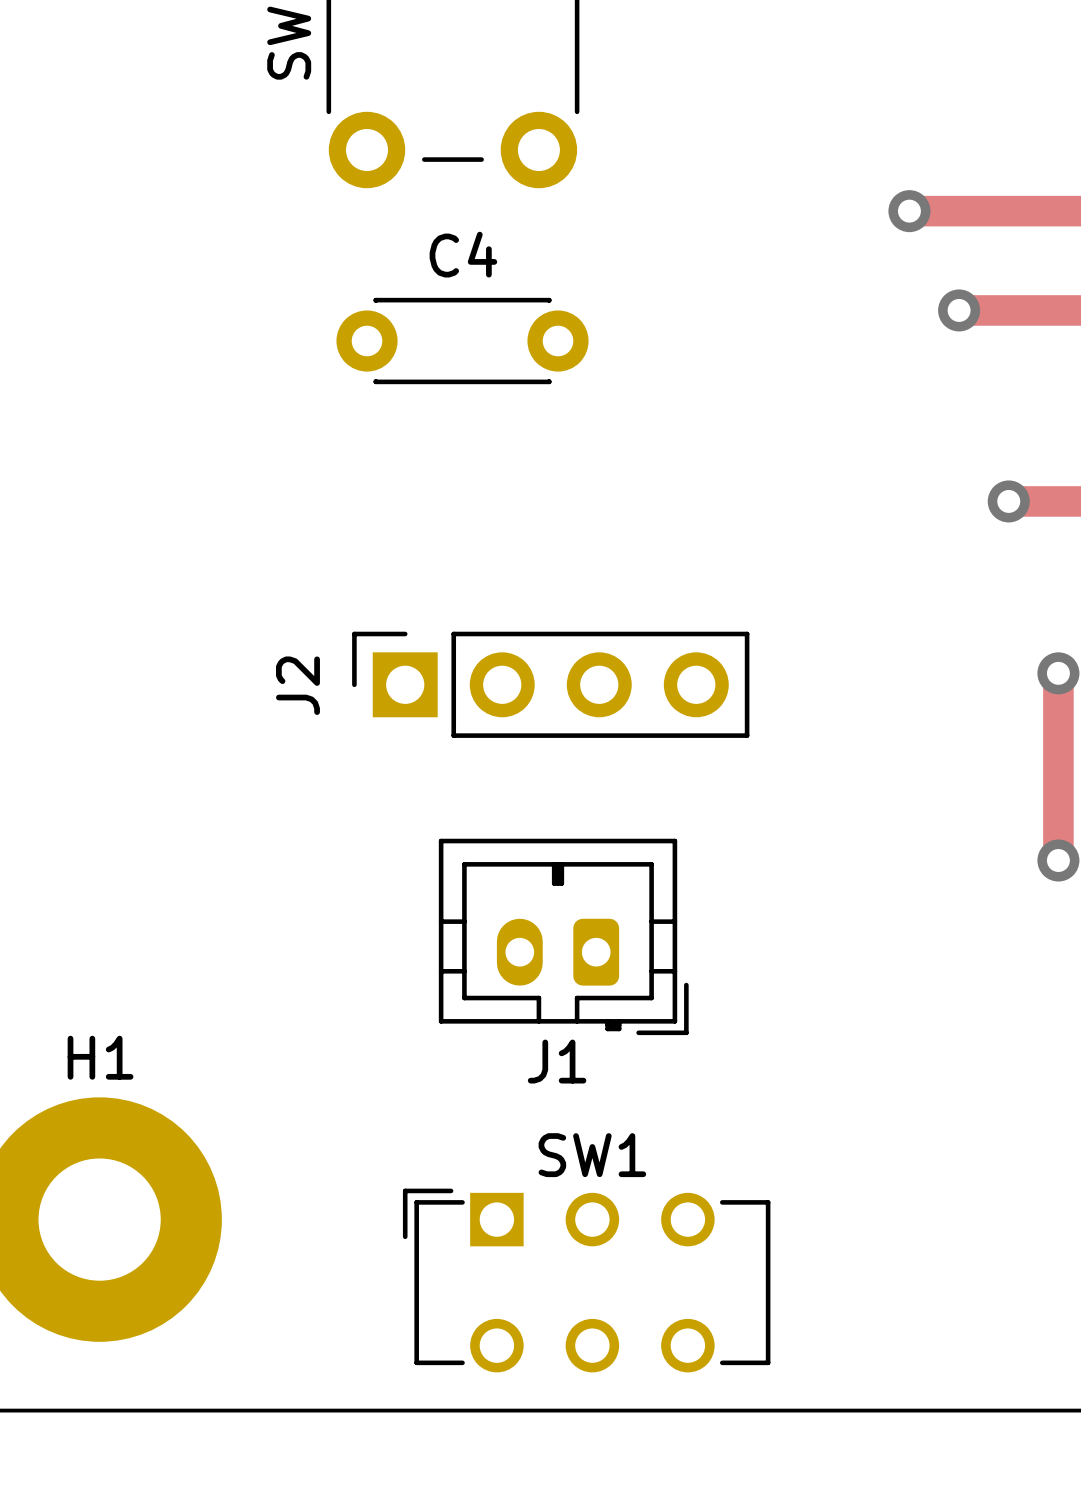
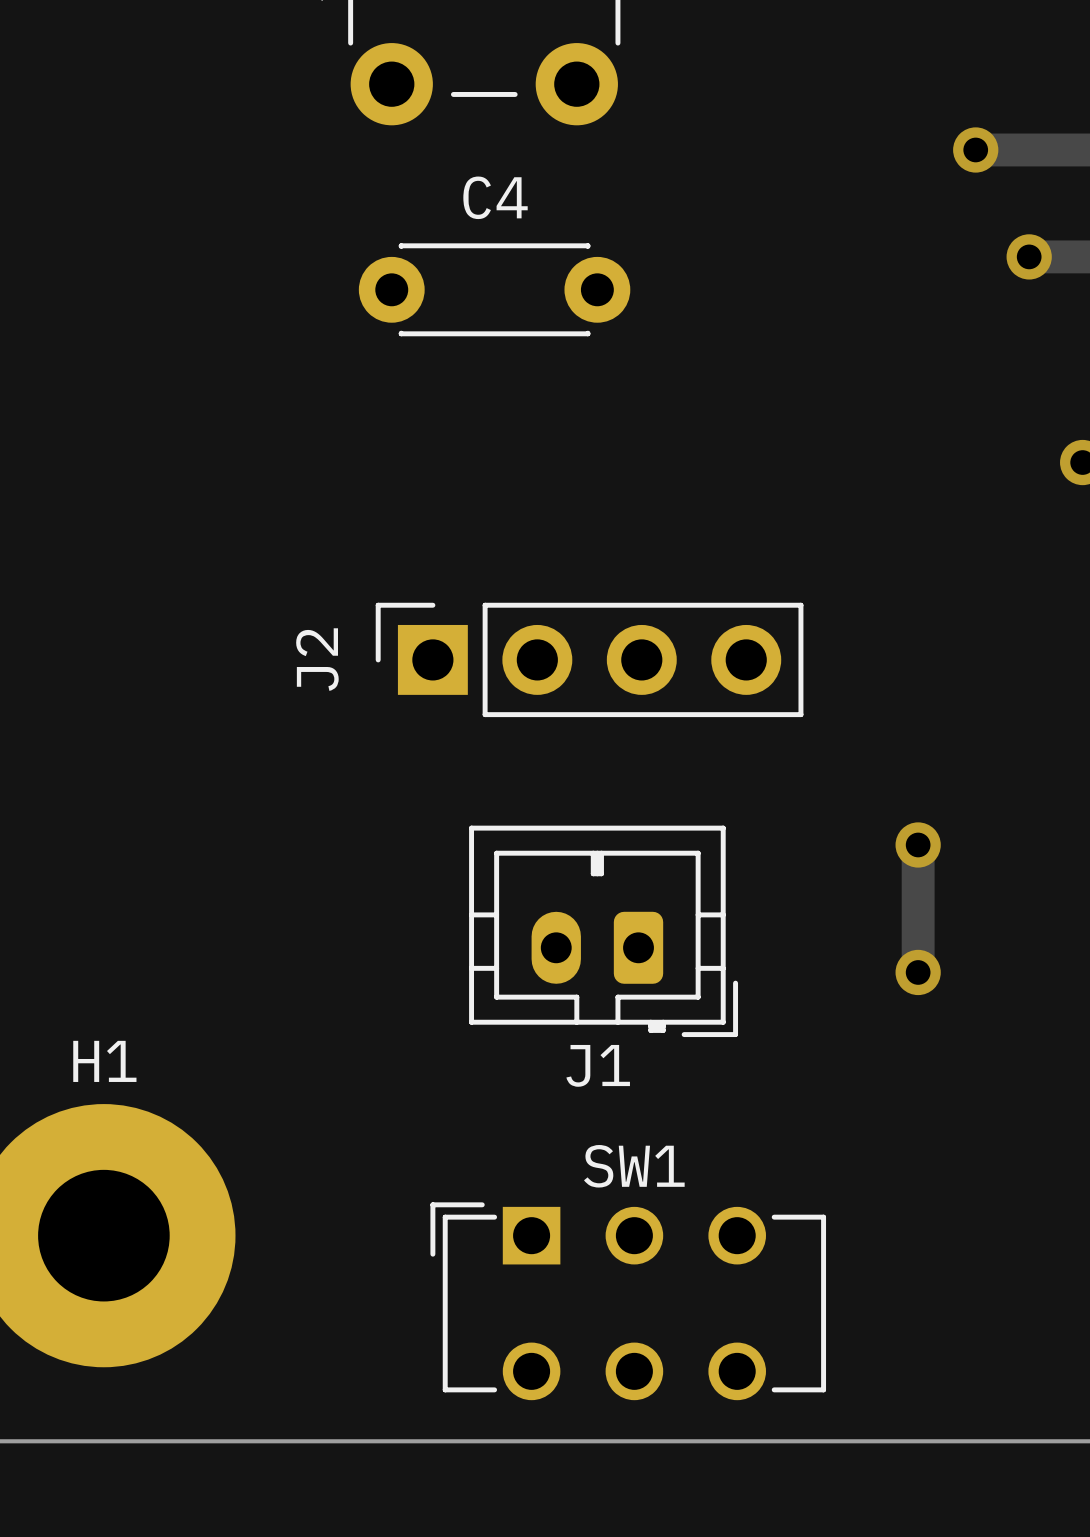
track: none -> (918, 844) (918, 972)
via: none -> (918, 844)
via: none -> (918, 972)

